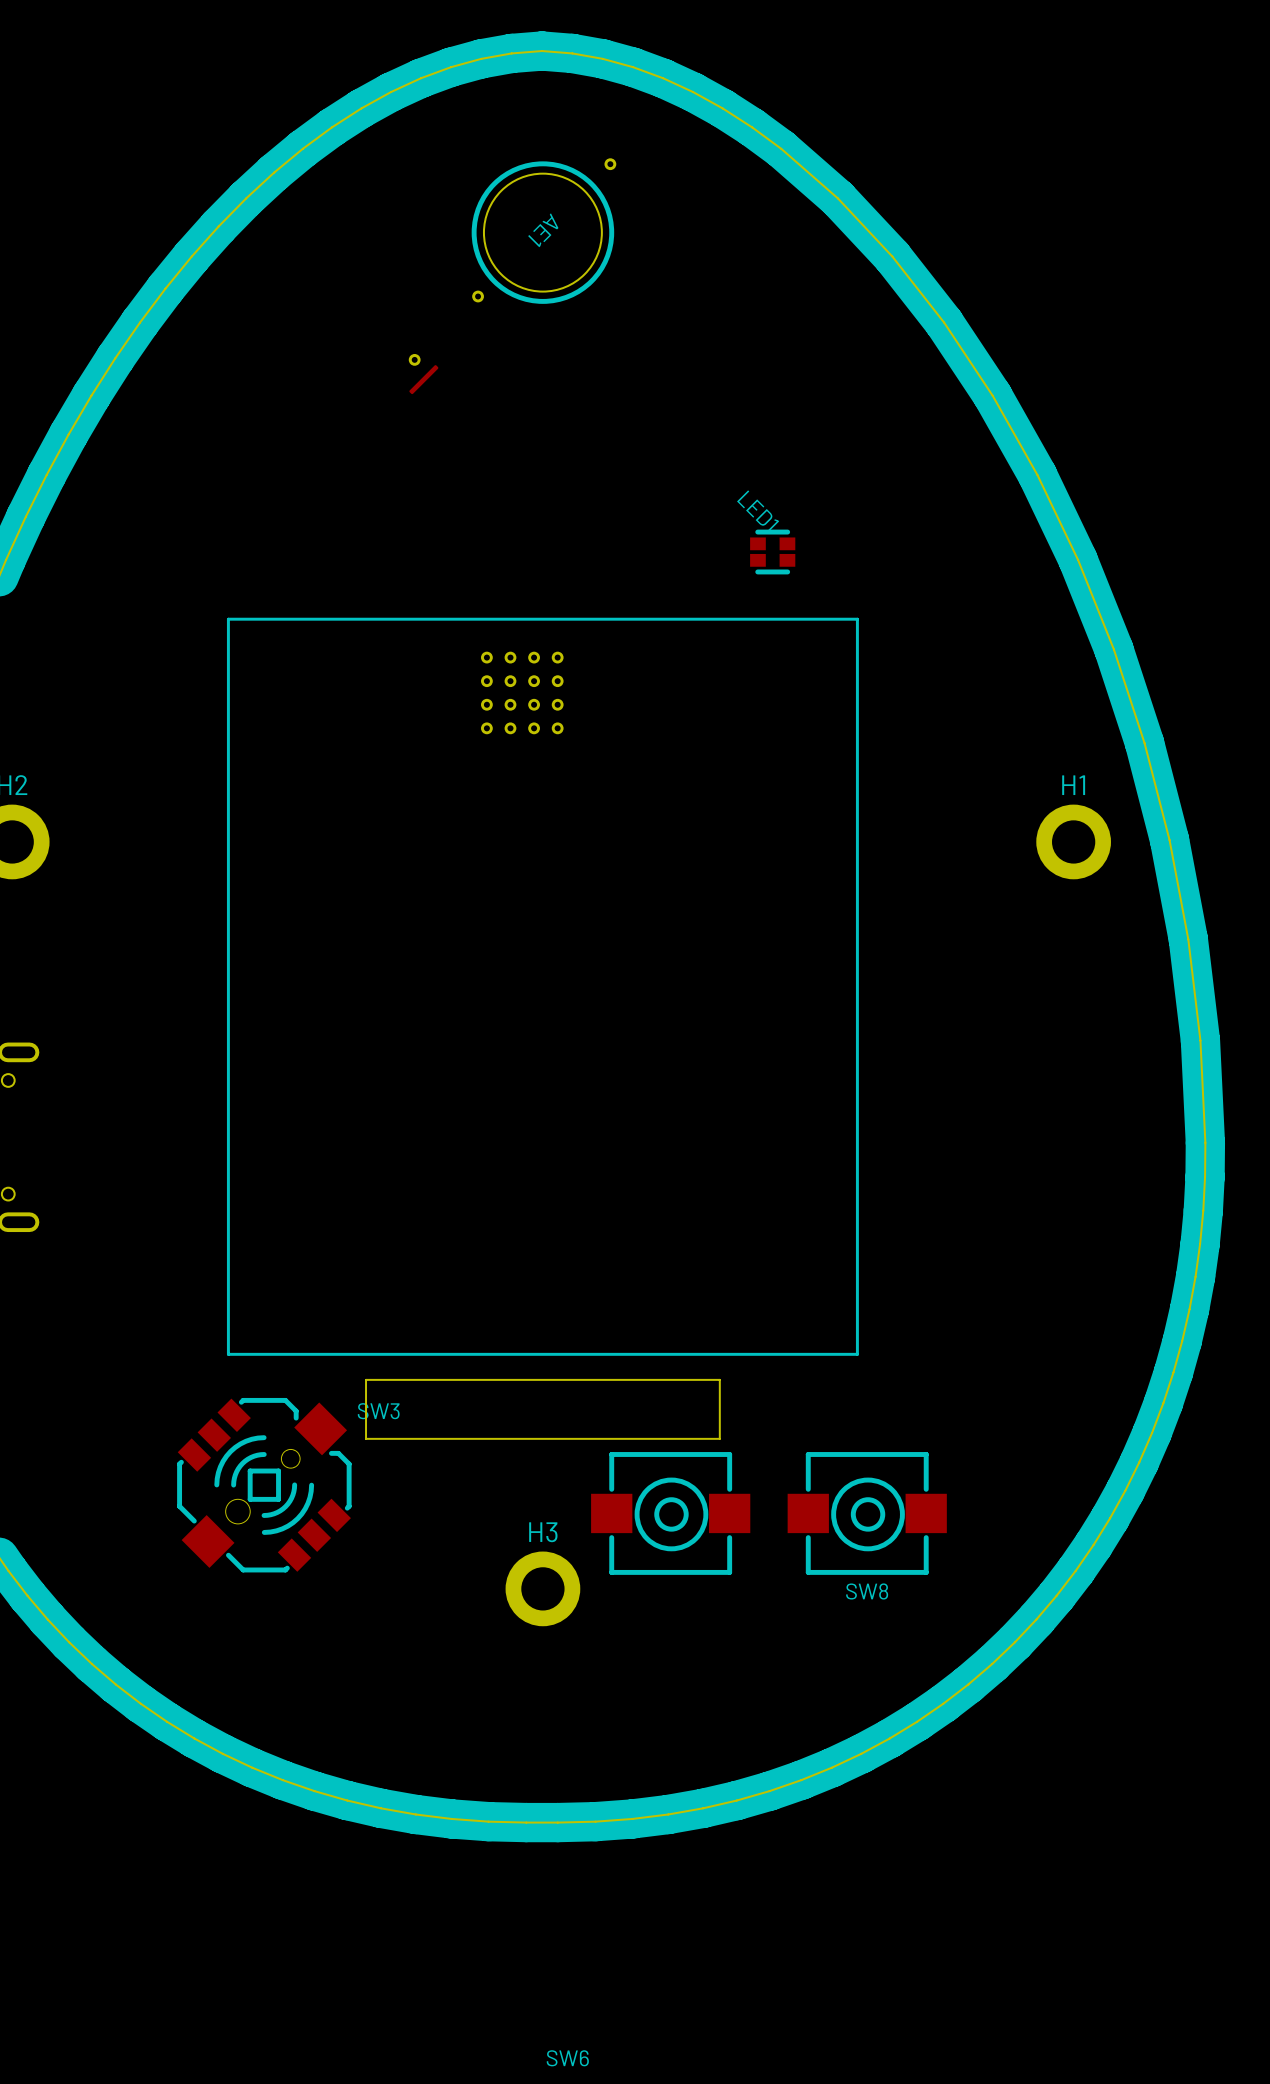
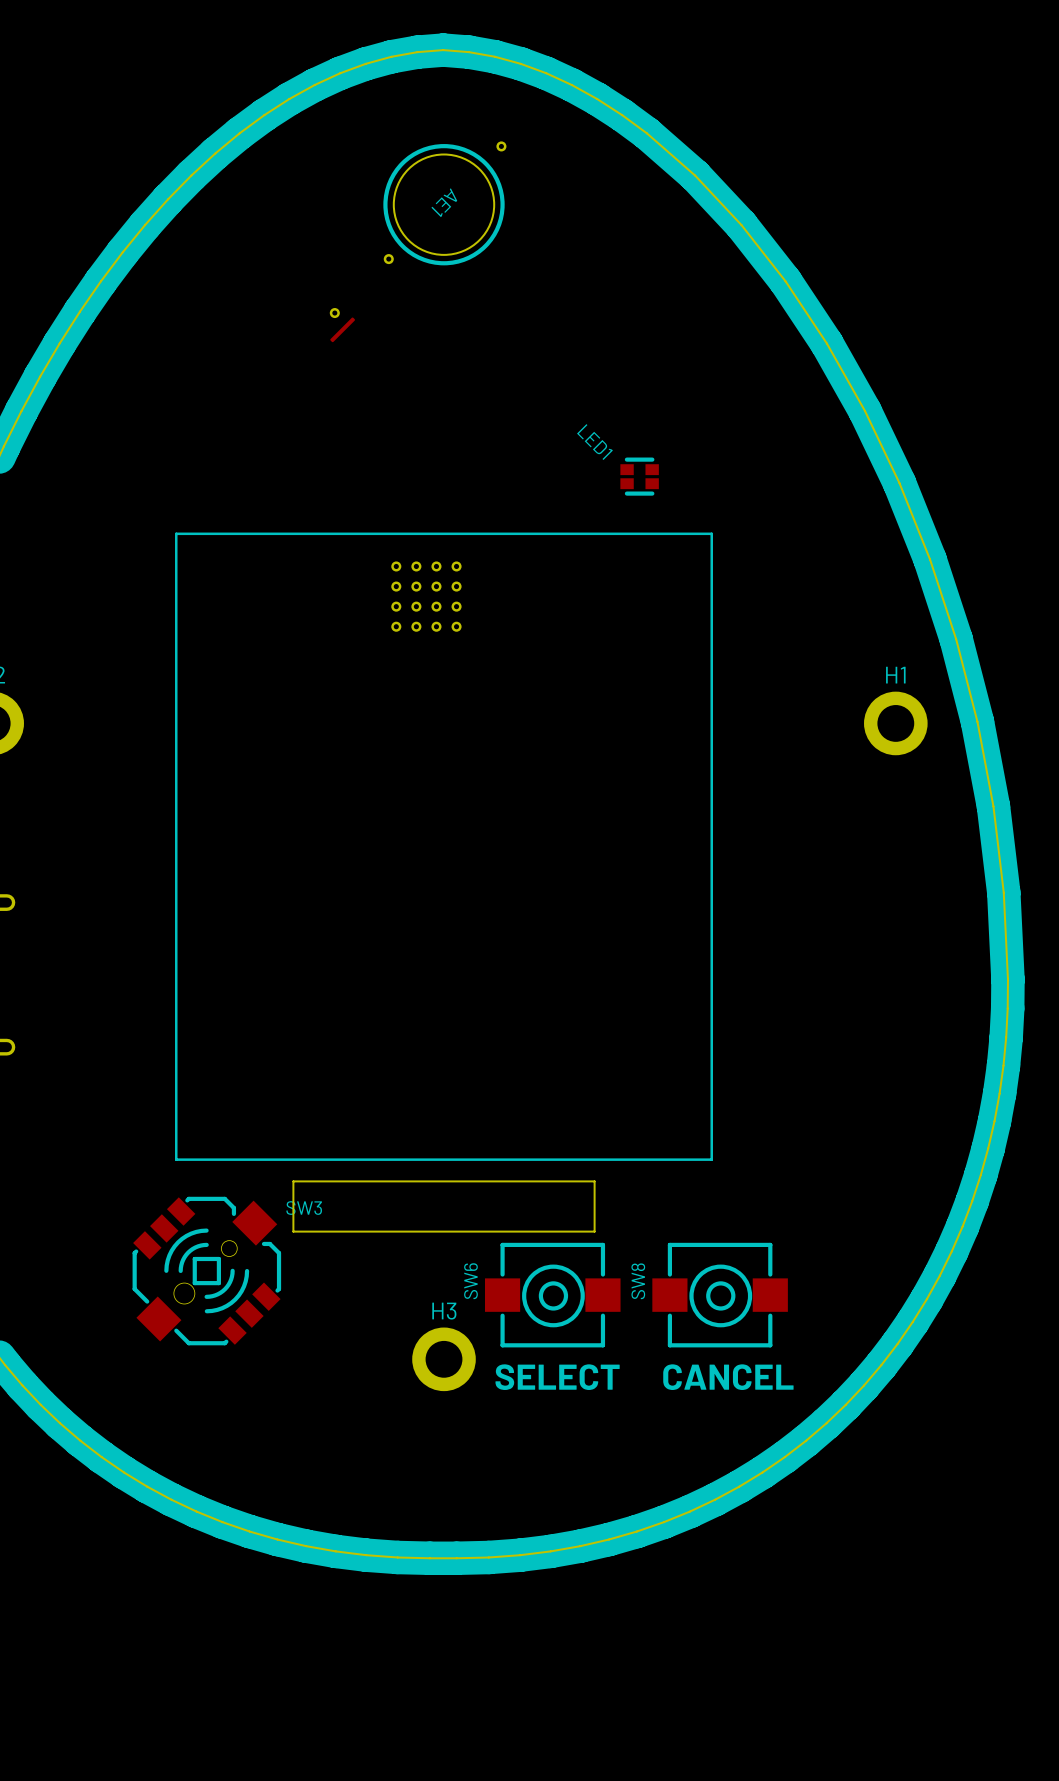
LED1 name position: LED1 (758, 511) -> LED1 (594, 442)
SW8 name rotation: 0° (867, 1591) -> 90° counterclockwise (638, 1281)
SW8 name position: SW8 (867, 1591) -> SW8 (638, 1281)
text: none -> SELECT (557, 1377)
text: none -> CANCEL (728, 1377)
SW6 name rotation: 0° (567, 2058) -> 90° counterclockwise (470, 1281)
SW6 name position: SW6 (567, 2058) -> SW6 (470, 1281)

